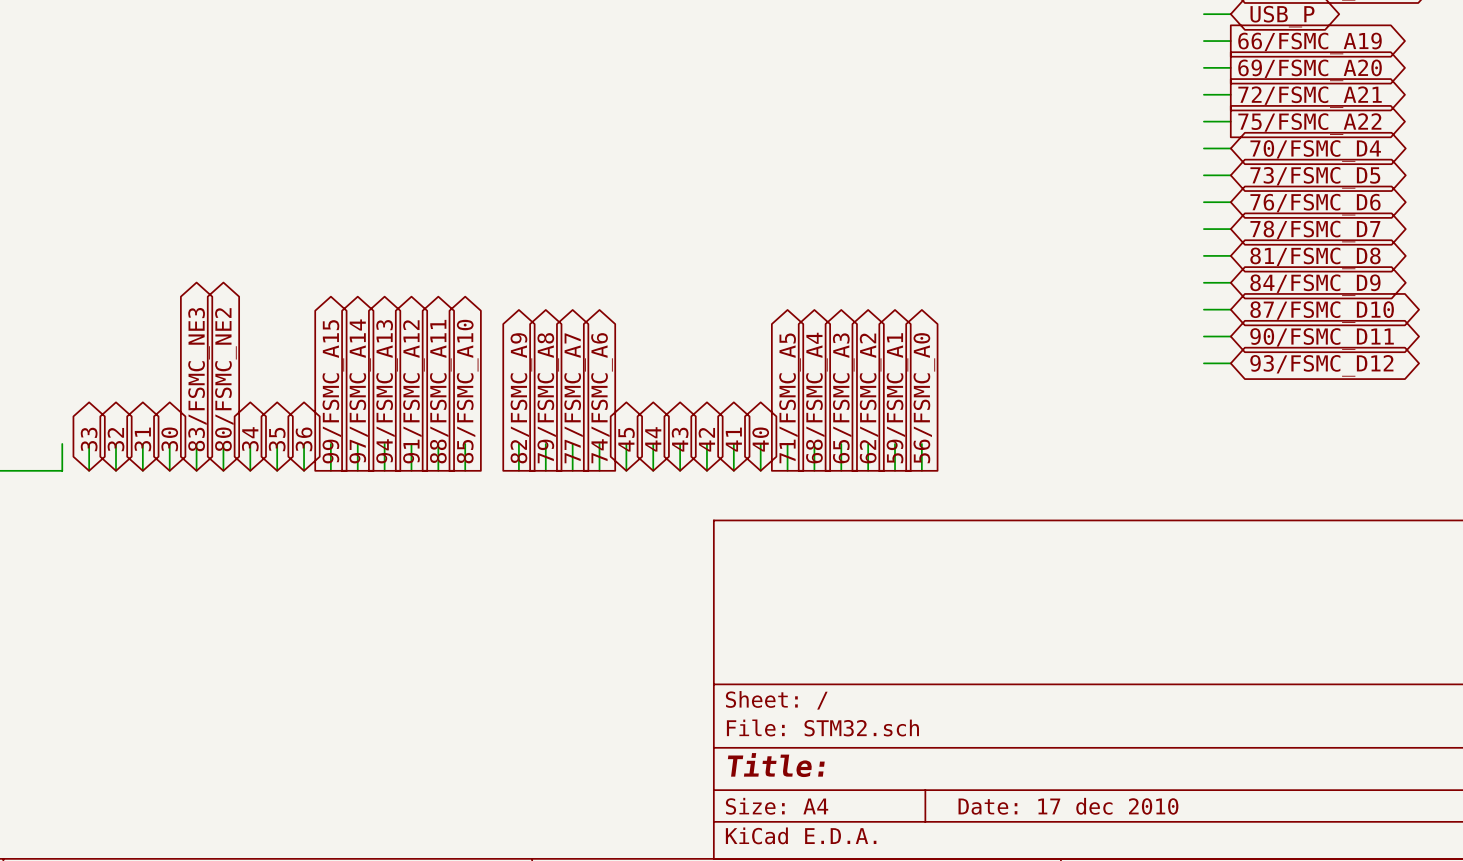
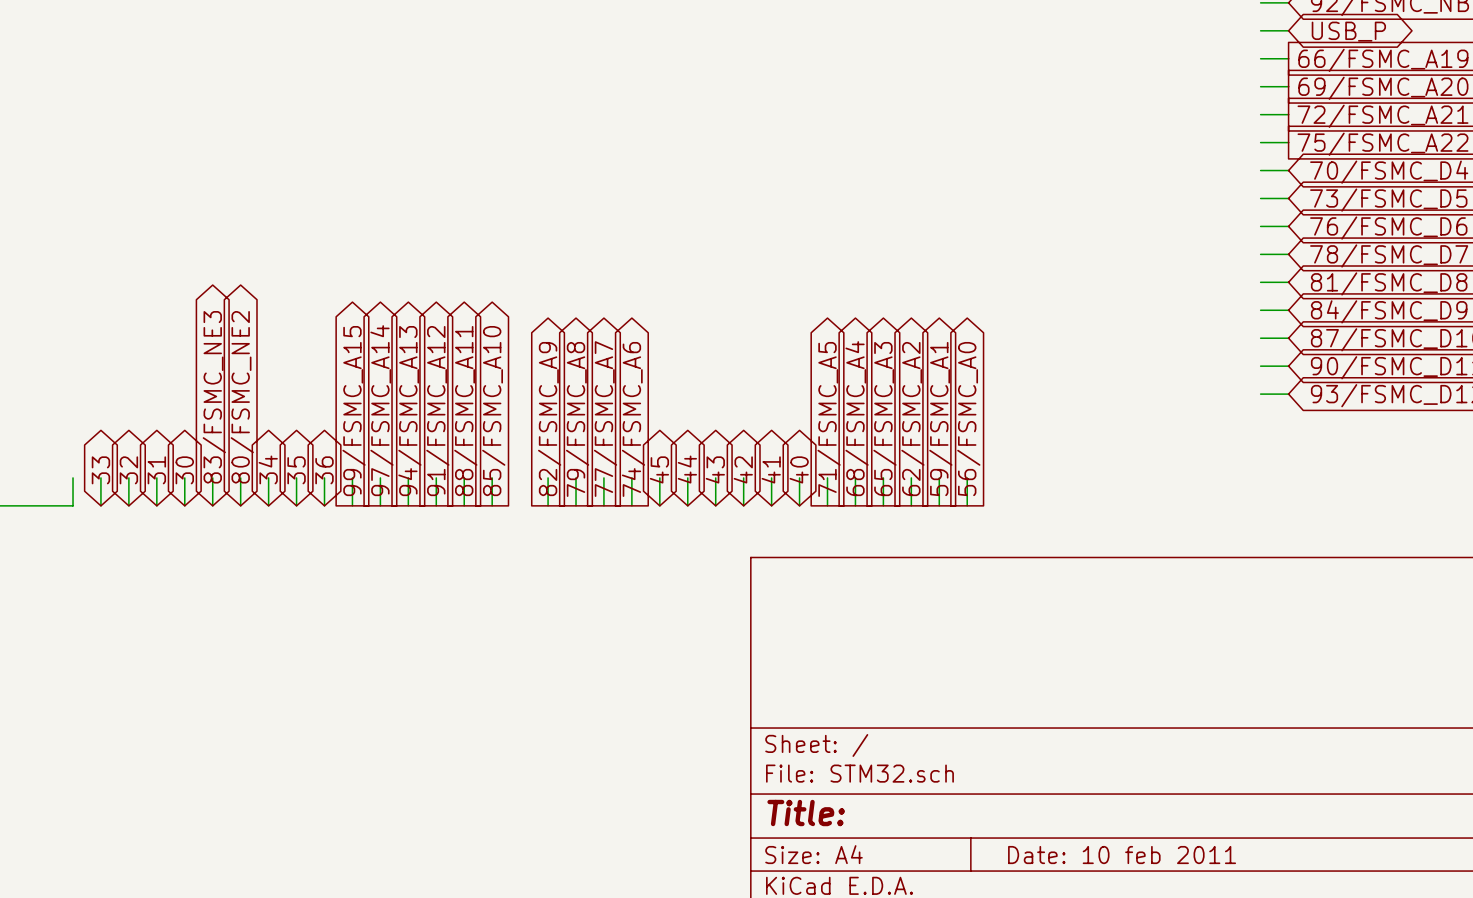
title block: Date: 17 dec 2010 (1068, 806) -> Date: 10 feb 2011 (1122, 855)

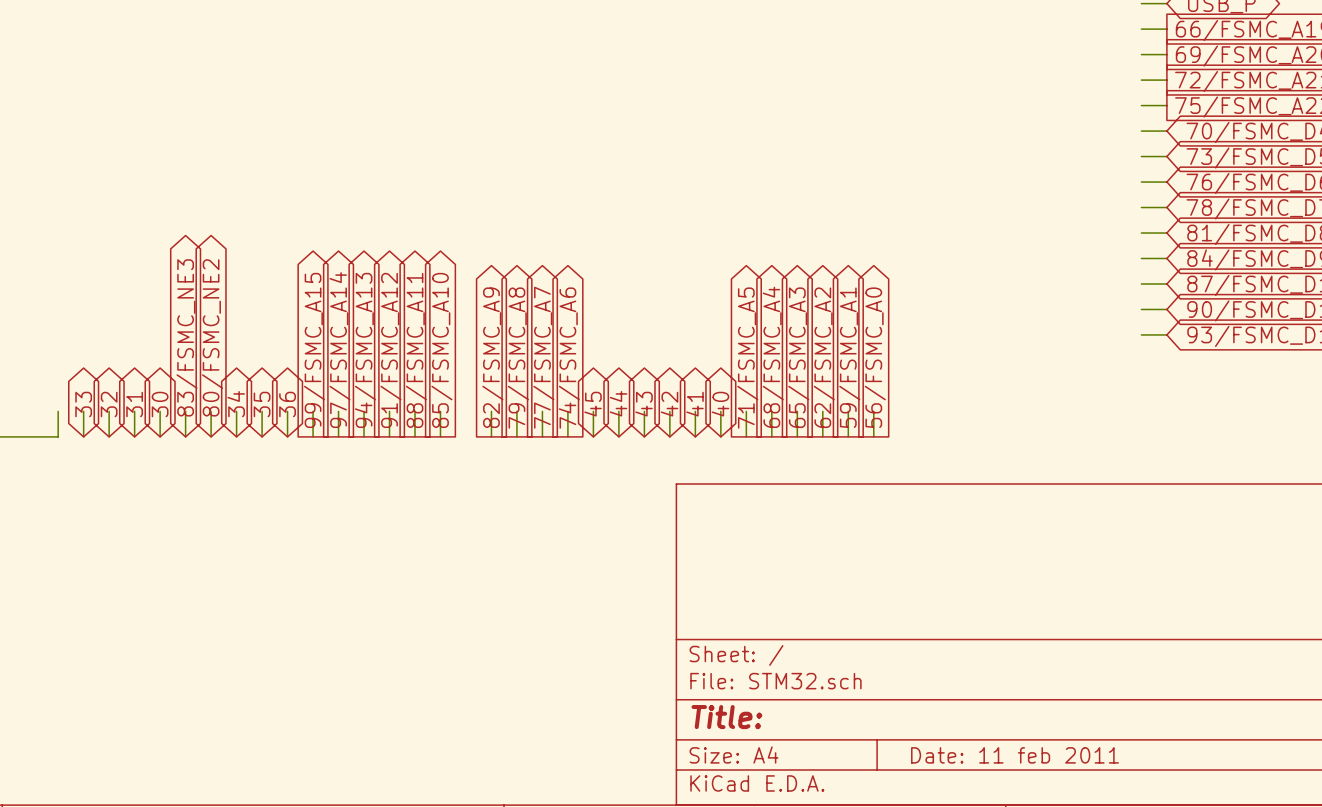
title block: Date: 10 feb 2011 (1122, 855) -> Date: 11 feb 2011 (1015, 755)

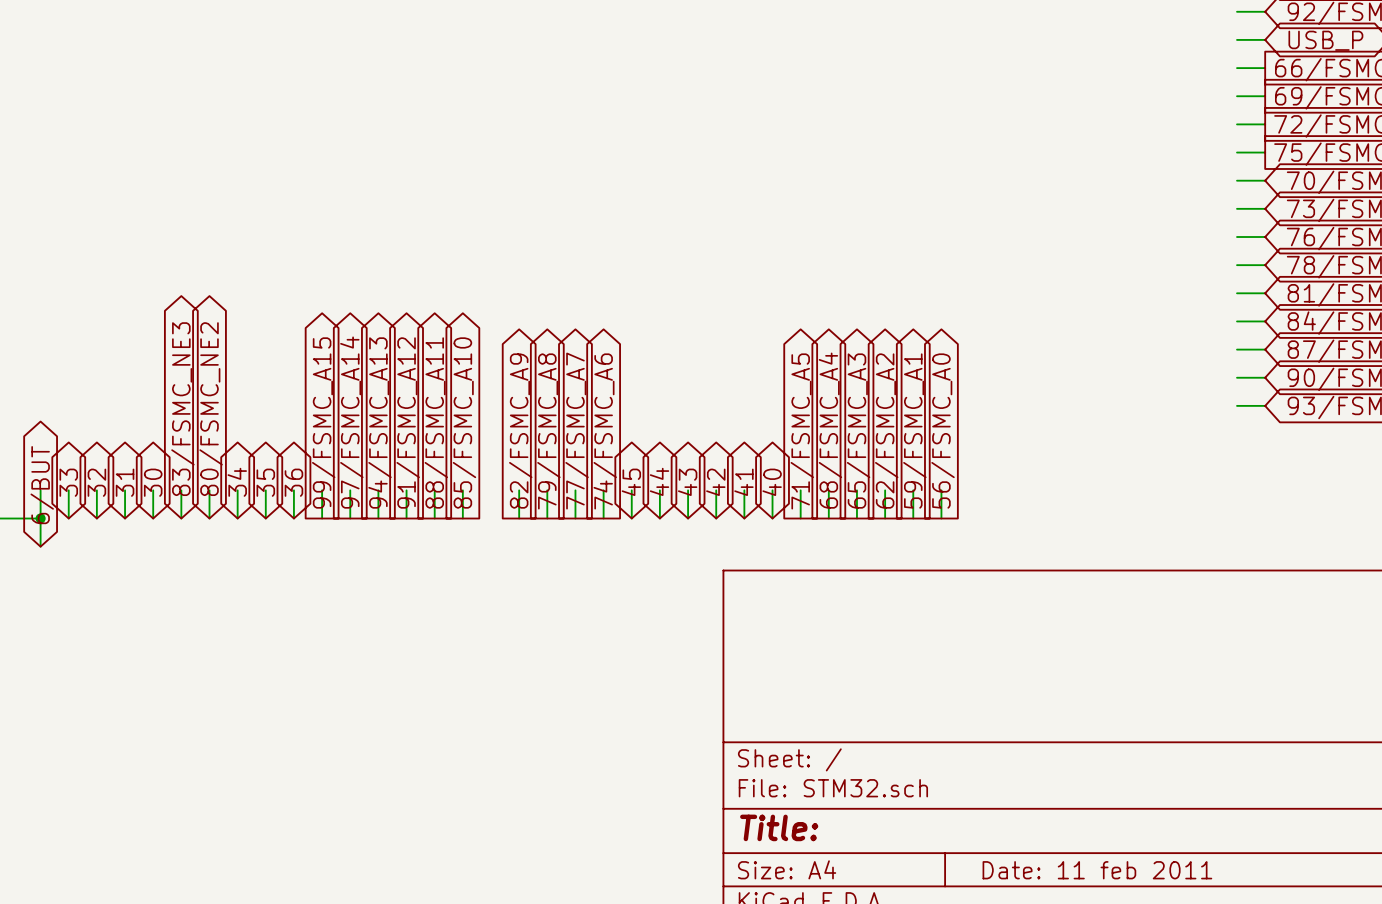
global label: none -> 6/BUT (42, 485)
wire: none -> (40, 518) (40, 546)
junction: none -> (40, 518)

